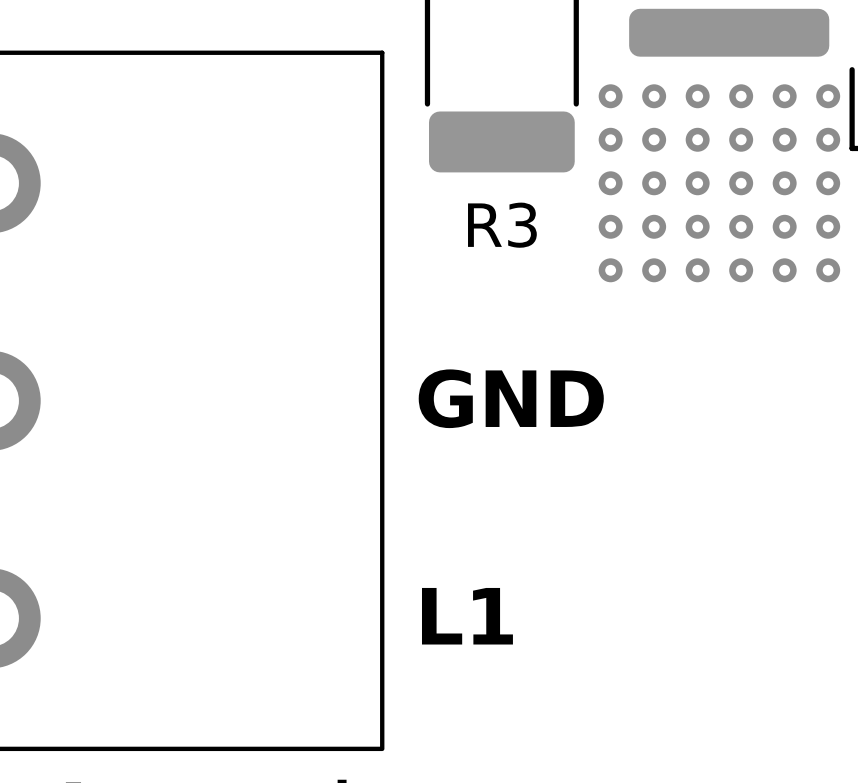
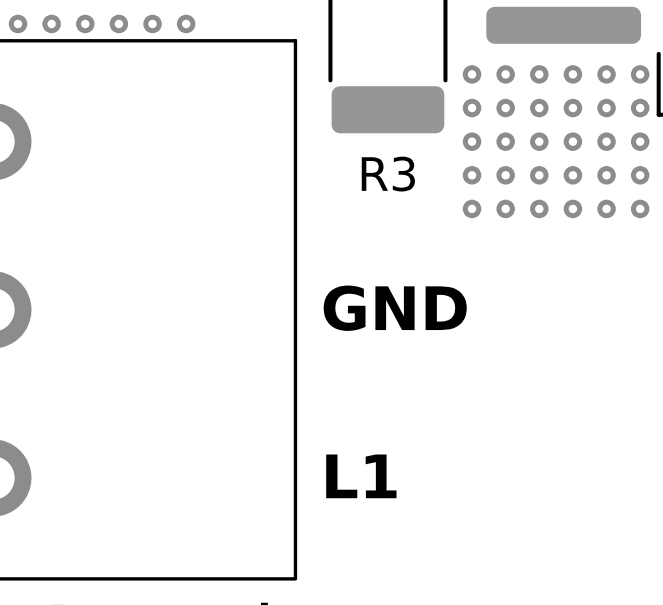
via: none -> (18, 23)
via: none -> (51, 23)
via: none -> (85, 23)
via: none -> (118, 23)
via: none -> (152, 23)
via: none -> (186, 23)

